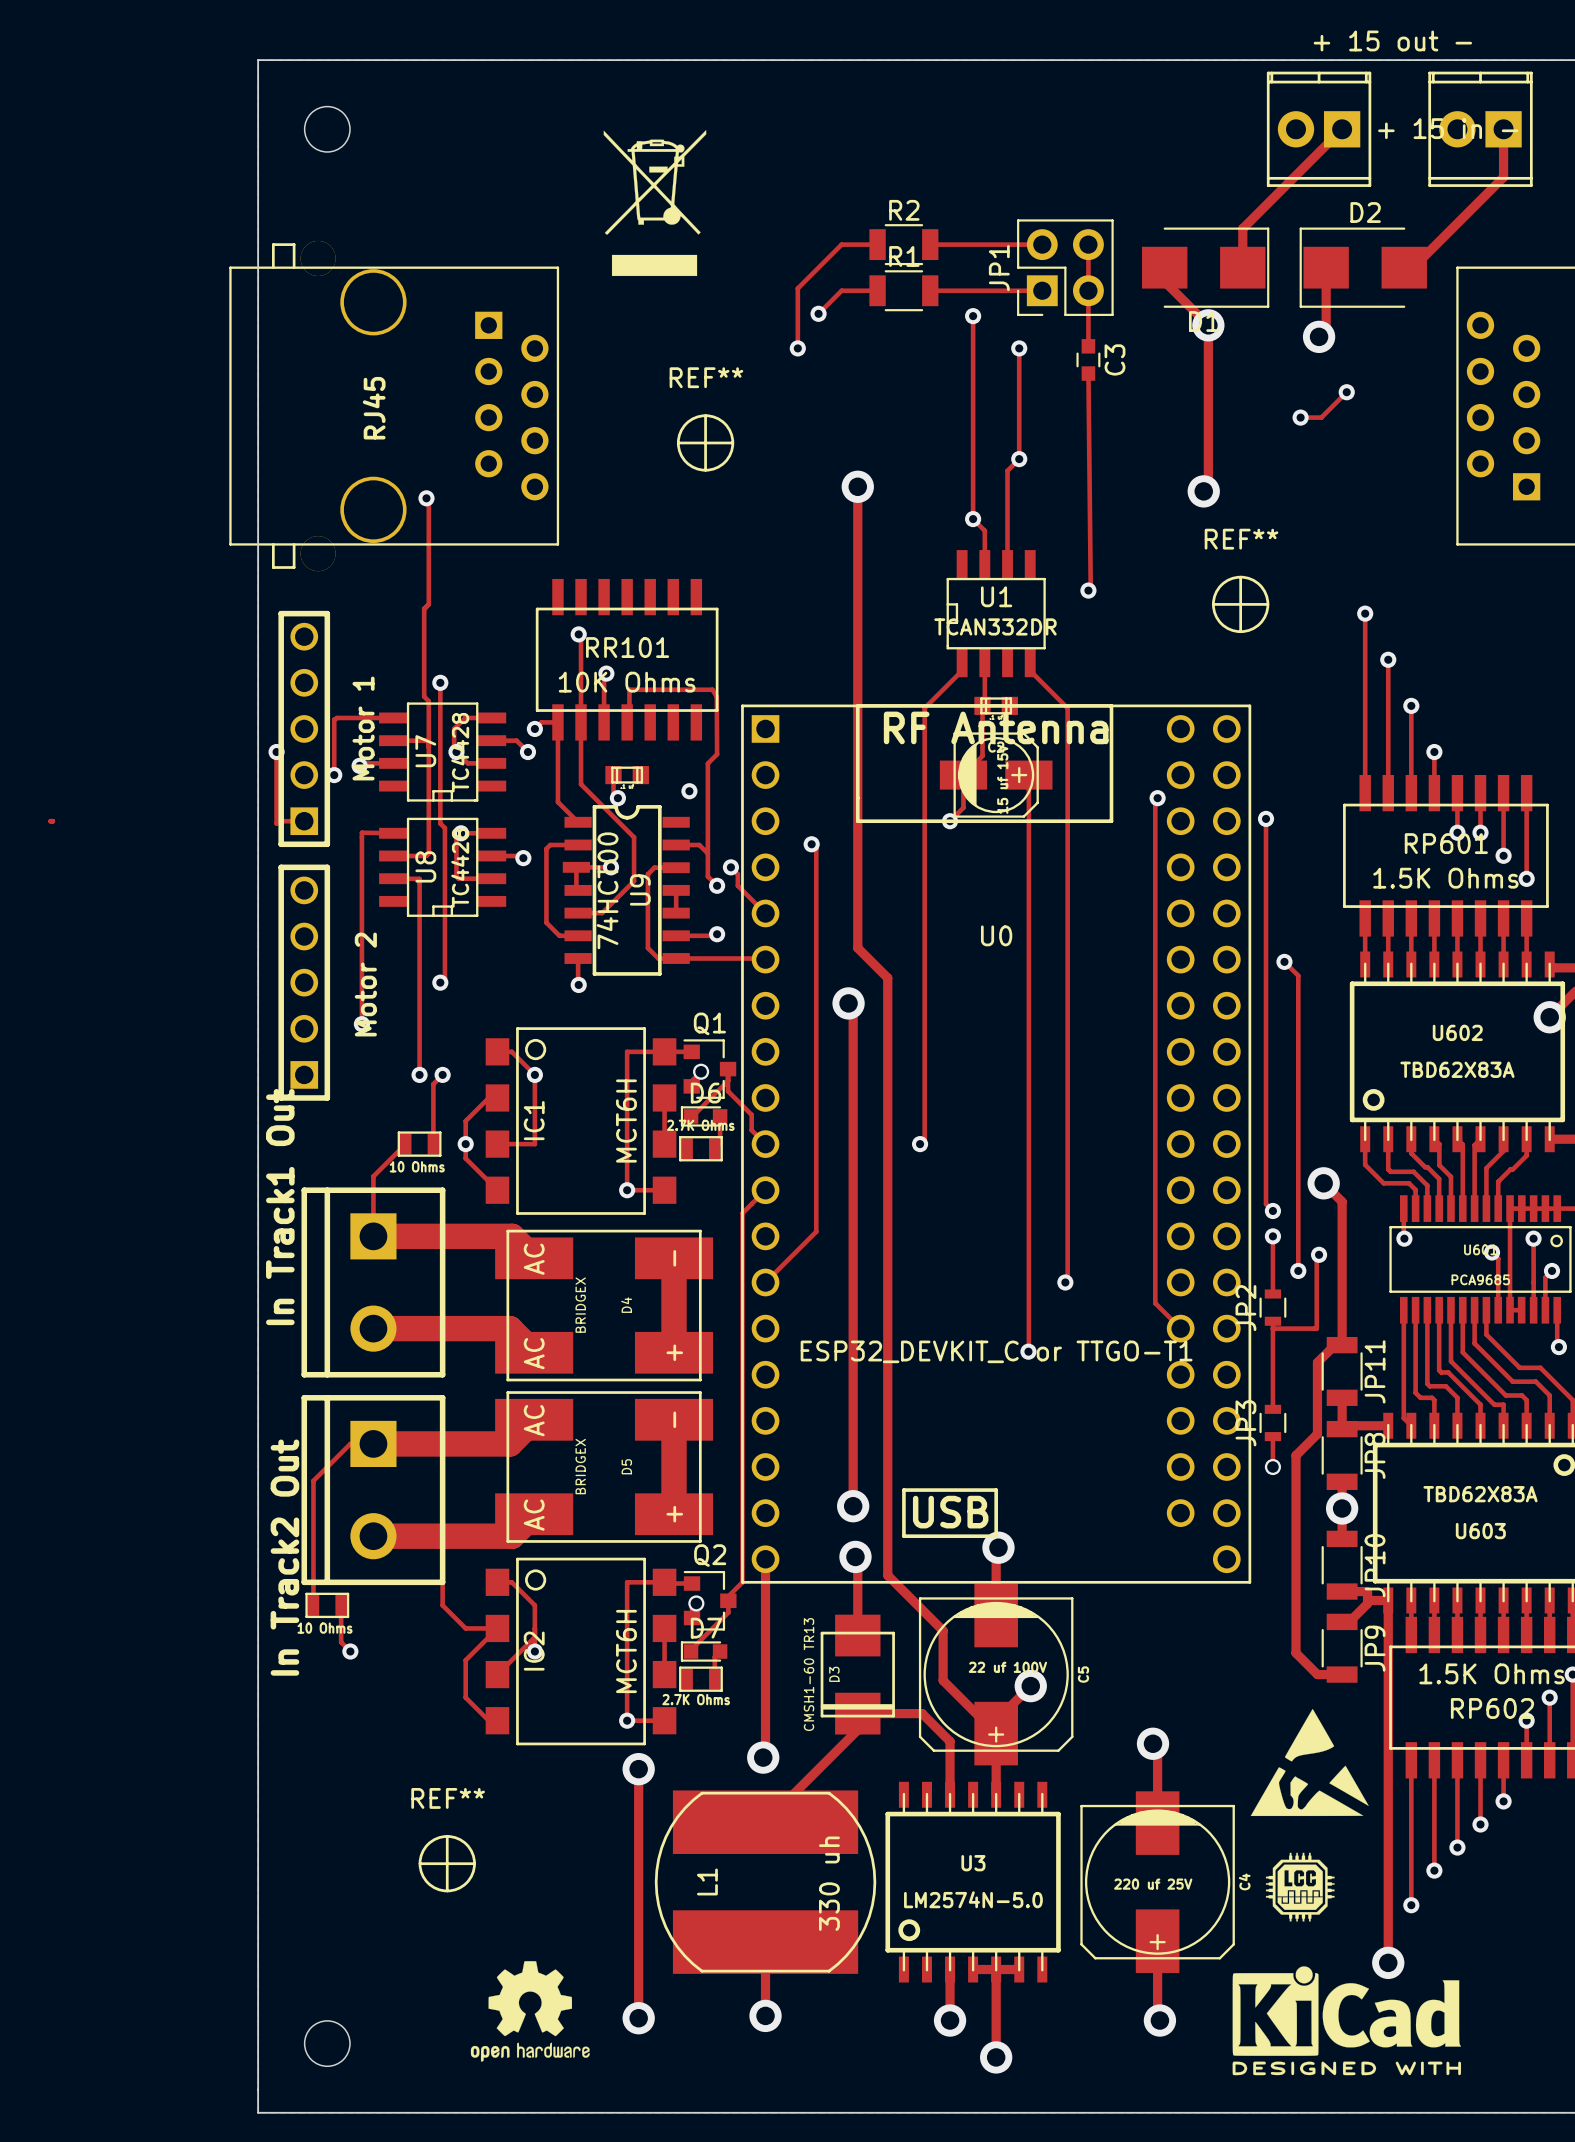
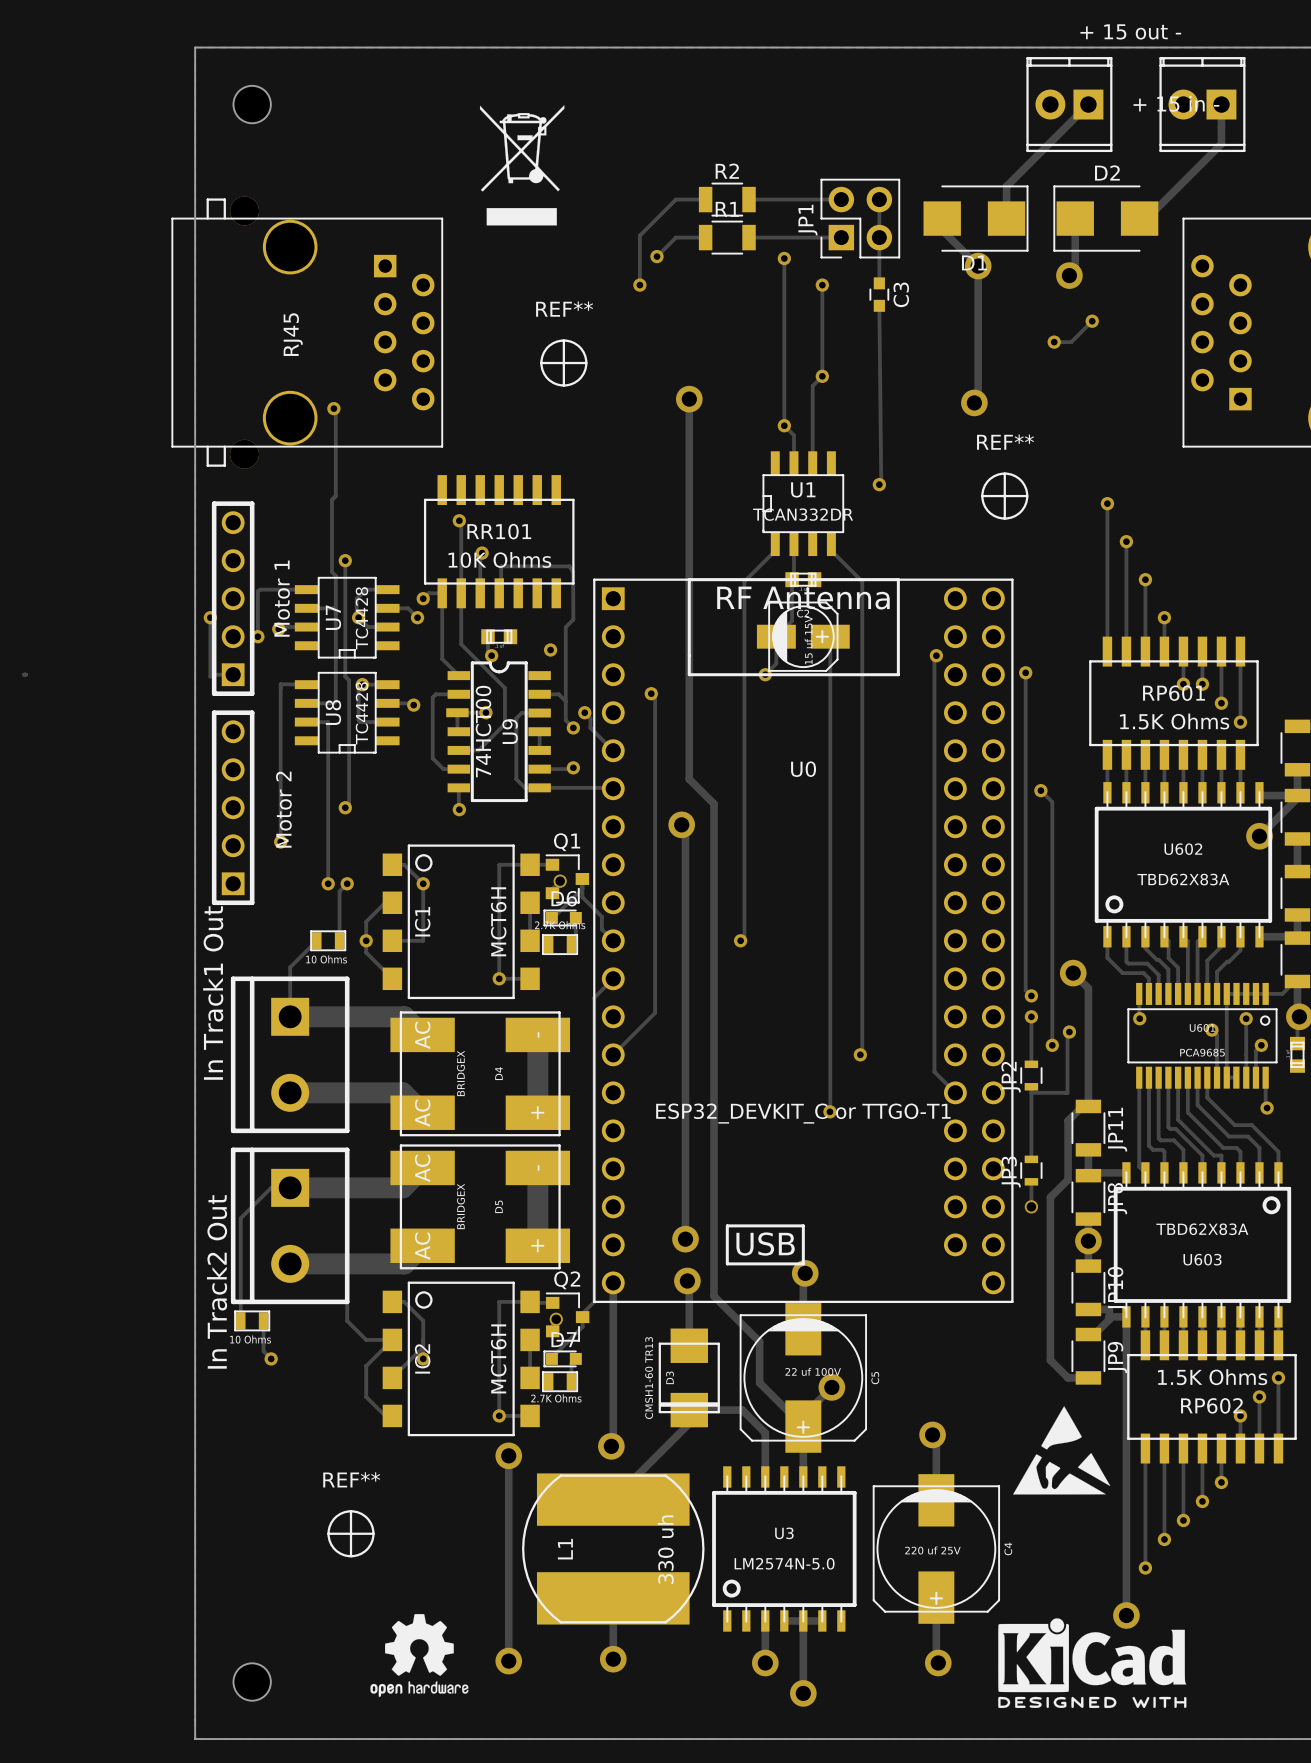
drawing: [1265, 1852, 1335, 1922] -> none

